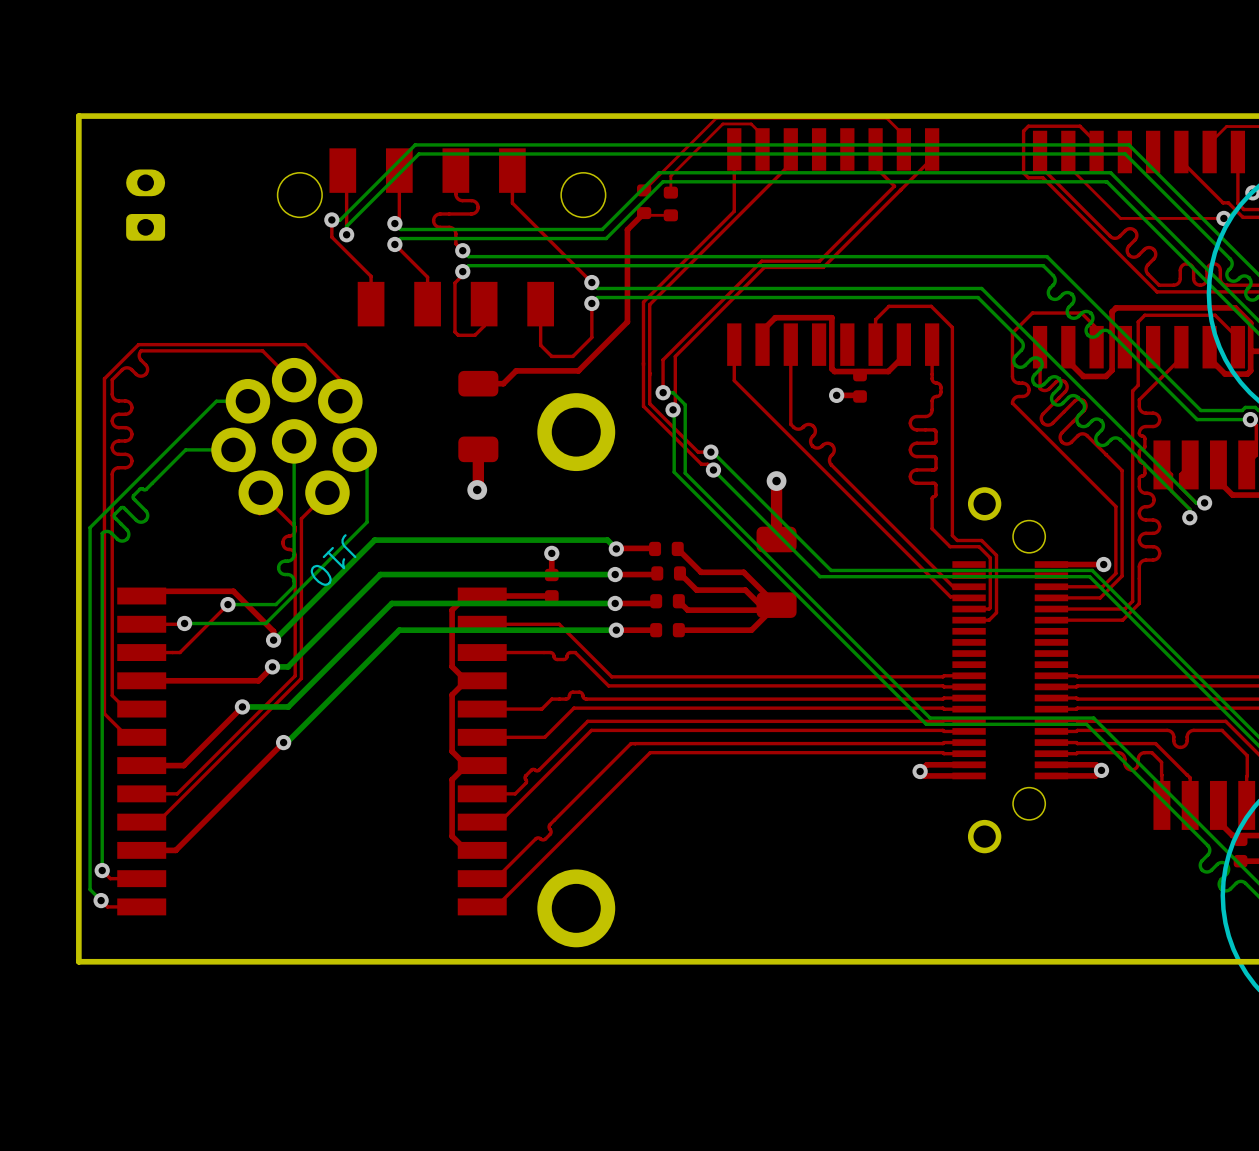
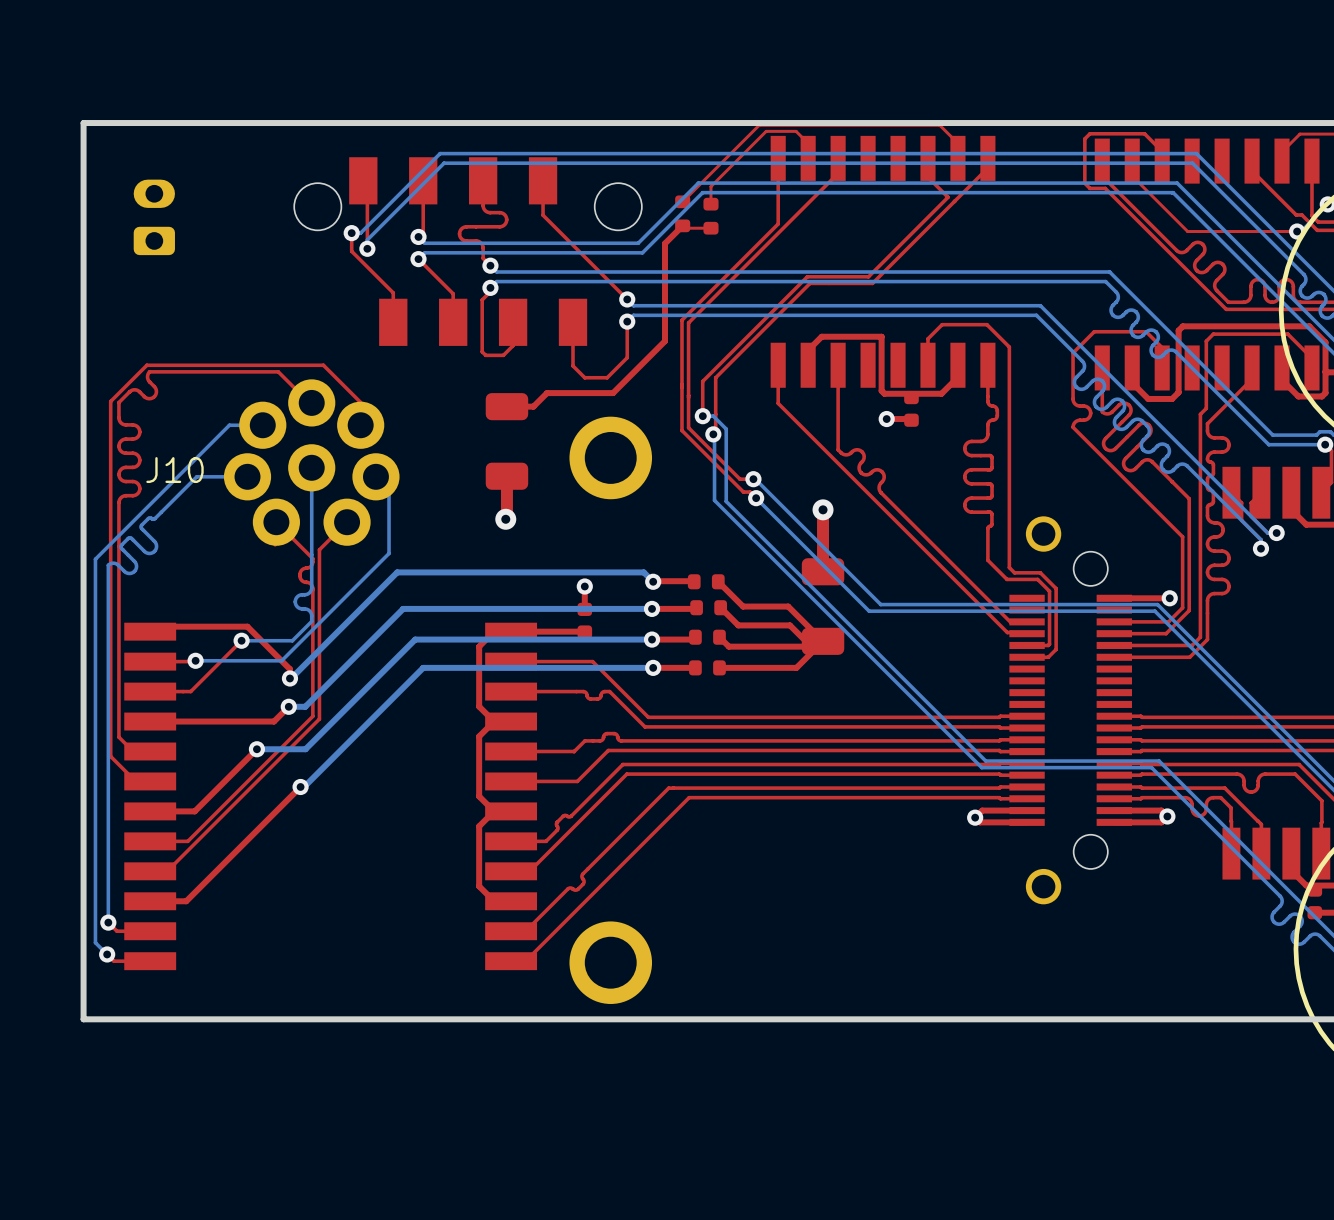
J10 name rotation: 0° (333, 560) -> 135° counterclockwise (175, 470)
J10 name position: J10 (333, 560) -> J10 (175, 470)

